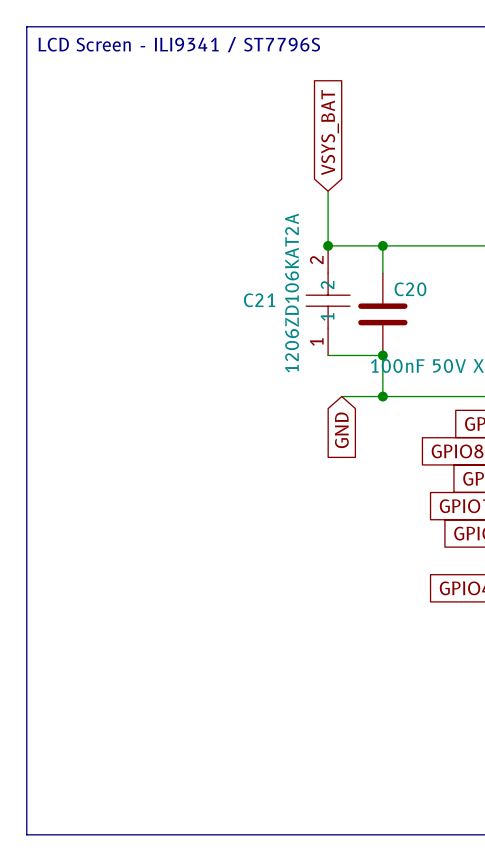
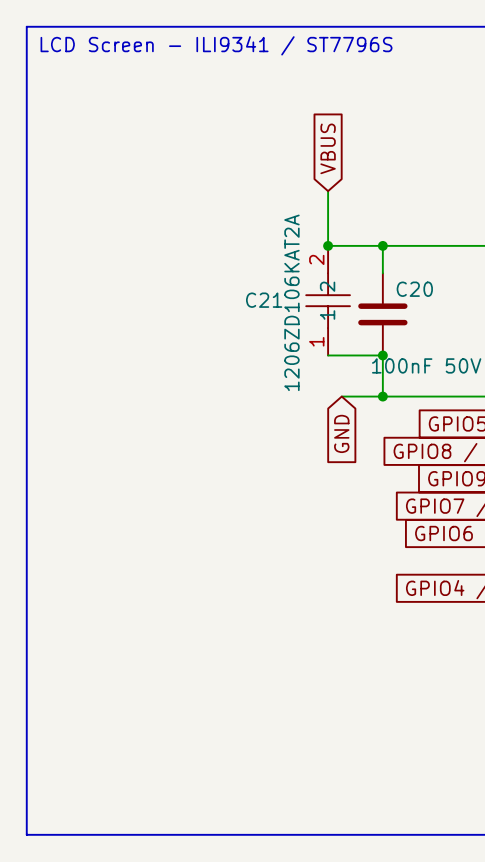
global label: VSYS_BAT (330, 132) -> VBUS (328, 148)

